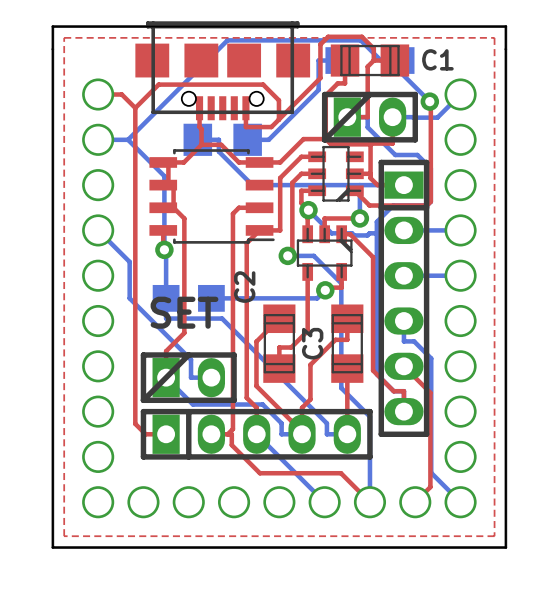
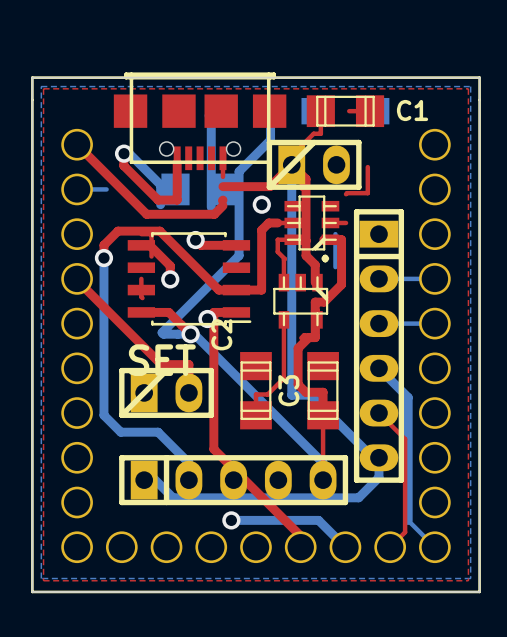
bottom zone outline: none -> (41, 86) (470, 86) (470, 578) (41, 578) (41, 86)
bottom track: (338, 60) (318, 60) (318, 89) (268, 139) (247, 139) -> none
bottom track: (391, 60) (391, 62) (429, 101) -> none
bottom track: (401, 60) (380, 60) (360, 40) (227, 40) (128, 139) (164, 176) (166, 318) (222, 318) (326, 423) (326, 434) (347, 434) -> none
bottom track: none -> (209, 115) (211, 117) (211, 207)
bottom track: none -> (270, 115) (270, 140) (239, 171) (239, 255) (162, 332) (194, 334) (323, 463) (323, 468)
top track: (98, 94) (121, 94) (135, 108) -> (77, 144) (146, 214) (214, 214) (222, 205)
bottom track: (460, 94) (437, 117) (392, 117) -> none
top track: (429, 101) (430, 201) (427, 205) (369, 205) (354, 190) -> none
via: (429, 101) -> none
bottom track: none -> (124, 153) (129, 153) (160, 184) (160, 204)
top track: none -> (124, 153) (123, 165) (158, 200) (177, 200) (177, 162)
via: none -> (124, 153)
top track: (135, 108) (135, 423) (145, 434) (166, 434) -> none
top track: (135, 108) (158, 84) (263, 84) (278, 100) (278, 119) -> none
bottom track: none -> (291, 164) (291, 395) (310, 395) (373, 457) (378, 457) (378, 477) (358, 497) (173, 497) (144, 468)
bottom track: (347, 117) (367, 117) (367, 127) (395, 154) (417, 154) (430, 168) (430, 201) (427, 205) (393, 205) (376, 221) (376, 374) (393, 391) (403, 391) (403, 411) -> none
top track: (347, 117) (367, 117) (367, 66) (373, 60) (373, 48) (361, 36) (328, 36) (320, 44) (320, 78) (271, 127) (245, 127) -> none
part position: (369, 117) -> (314, 164)
top track: none -> (222, 186) (269, 186) (291, 164) (306, 179) (306, 255) (315, 264) (315, 282)
bottom track: (197, 139) (218, 139) (218, 151) (252, 185) (403, 185) -> none
top track: none -> (222, 200) (222, 200)
via: none -> (261, 204)
top track: (317, 156) (301, 156) (280, 178) (280, 230) (259, 230) (246, 243) (246, 397) (256, 407) (256, 434) -> none
top track: (163, 162) (183, 162) (201, 144) (221, 144) (238, 162) (280, 162) (303, 139) (325, 139) (330, 144) (370, 144) (370, 178) (377, 185) (403, 185) -> none
top track: (168, 162) (168, 185) -> none
top track: (301, 173) (292, 182) (292, 251) (287, 255) -> (277, 222) (268, 222) (261, 230) (261, 290) (218, 290) (159, 231) (118, 231) (103, 245) (103, 258)
top track: none -> (323, 239) (341, 239) (341, 284) (324, 302) (315, 302) (315, 337) (308, 337) (298, 348) (298, 384) (305, 392) (323, 392) (323, 415)
top track: none -> (195, 240) (200, 245) (236, 245)
via: none -> (195, 240)
top track: none -> (141, 245) (149, 245) (170, 265) (170, 279)
part position: (212, 196) -> (189, 278)
top track: (163, 207) (173, 207) (184, 218) (184, 332) (166, 351) (166, 377) -> none
top track: (259, 207) (238, 207) (232, 213) (232, 429) (227, 434) -> none
bottom track: none -> (103, 258) (103, 415) (120, 432) (158, 432) (188, 463) (188, 468)
via: none -> (103, 258)
text: none -> . (325, 258)
bottom track: (308, 210) (331, 233) (352, 233) (354, 235) (376, 233) -> none
via: (308, 210) -> none
top track: (359, 218) (324, 218) (324, 234) -> none
via: (359, 218) -> none
bottom track: (98, 230) (129, 261) (129, 298) (191, 359) (191, 377) (211, 377) -> none
top track: none -> (77, 278) (161, 364) (188, 364) (188, 392)
via: none -> (170, 279)
top track: (341, 234) (350, 234) (373, 257) (373, 370) (393, 391) (403, 391) (403, 411) -> none
via: (164, 249) -> none
bottom track: (287, 255) (313, 255) (341, 283) (341, 388) (369, 416) (369, 502) -> (231, 520) (318, 520) (345, 547)
via: (287, 255) -> none
top track: none -> (141, 312) (168, 312) (190, 334)
top track: none -> (236, 312) (213, 312) (213, 449) (300, 536) (300, 547)
via: none -> (207, 319)
via: none -> (190, 334)
bottom track: (325, 290) (317, 298) (211, 298) -> none
via: (325, 290) -> none
part: (166, 298) -> none
part: (211, 298) -> none
top track: (279, 318) (256, 341) (256, 386) (291, 421) (302, 421) -> none
top track: (347, 318) (347, 339) (335, 339) (310, 364) (310, 399) (302, 407) (302, 434) -> none
bottom track: (403, 321) (403, 341) (414, 341) (431, 358) (431, 472) (433, 475) -> (378, 368) (408, 397) (408, 520)
bottom track: (166, 377) (192, 404) (262, 404) (281, 423) (281, 434) (302, 434) -> none
part position: (188, 377) -> (166, 392)
top track: (211, 434) (231, 434) (231, 445) (259, 473) (340, 473) (369, 502) -> none
bottom track: (256, 434) (324, 502) -> none
via: none -> (231, 520)

